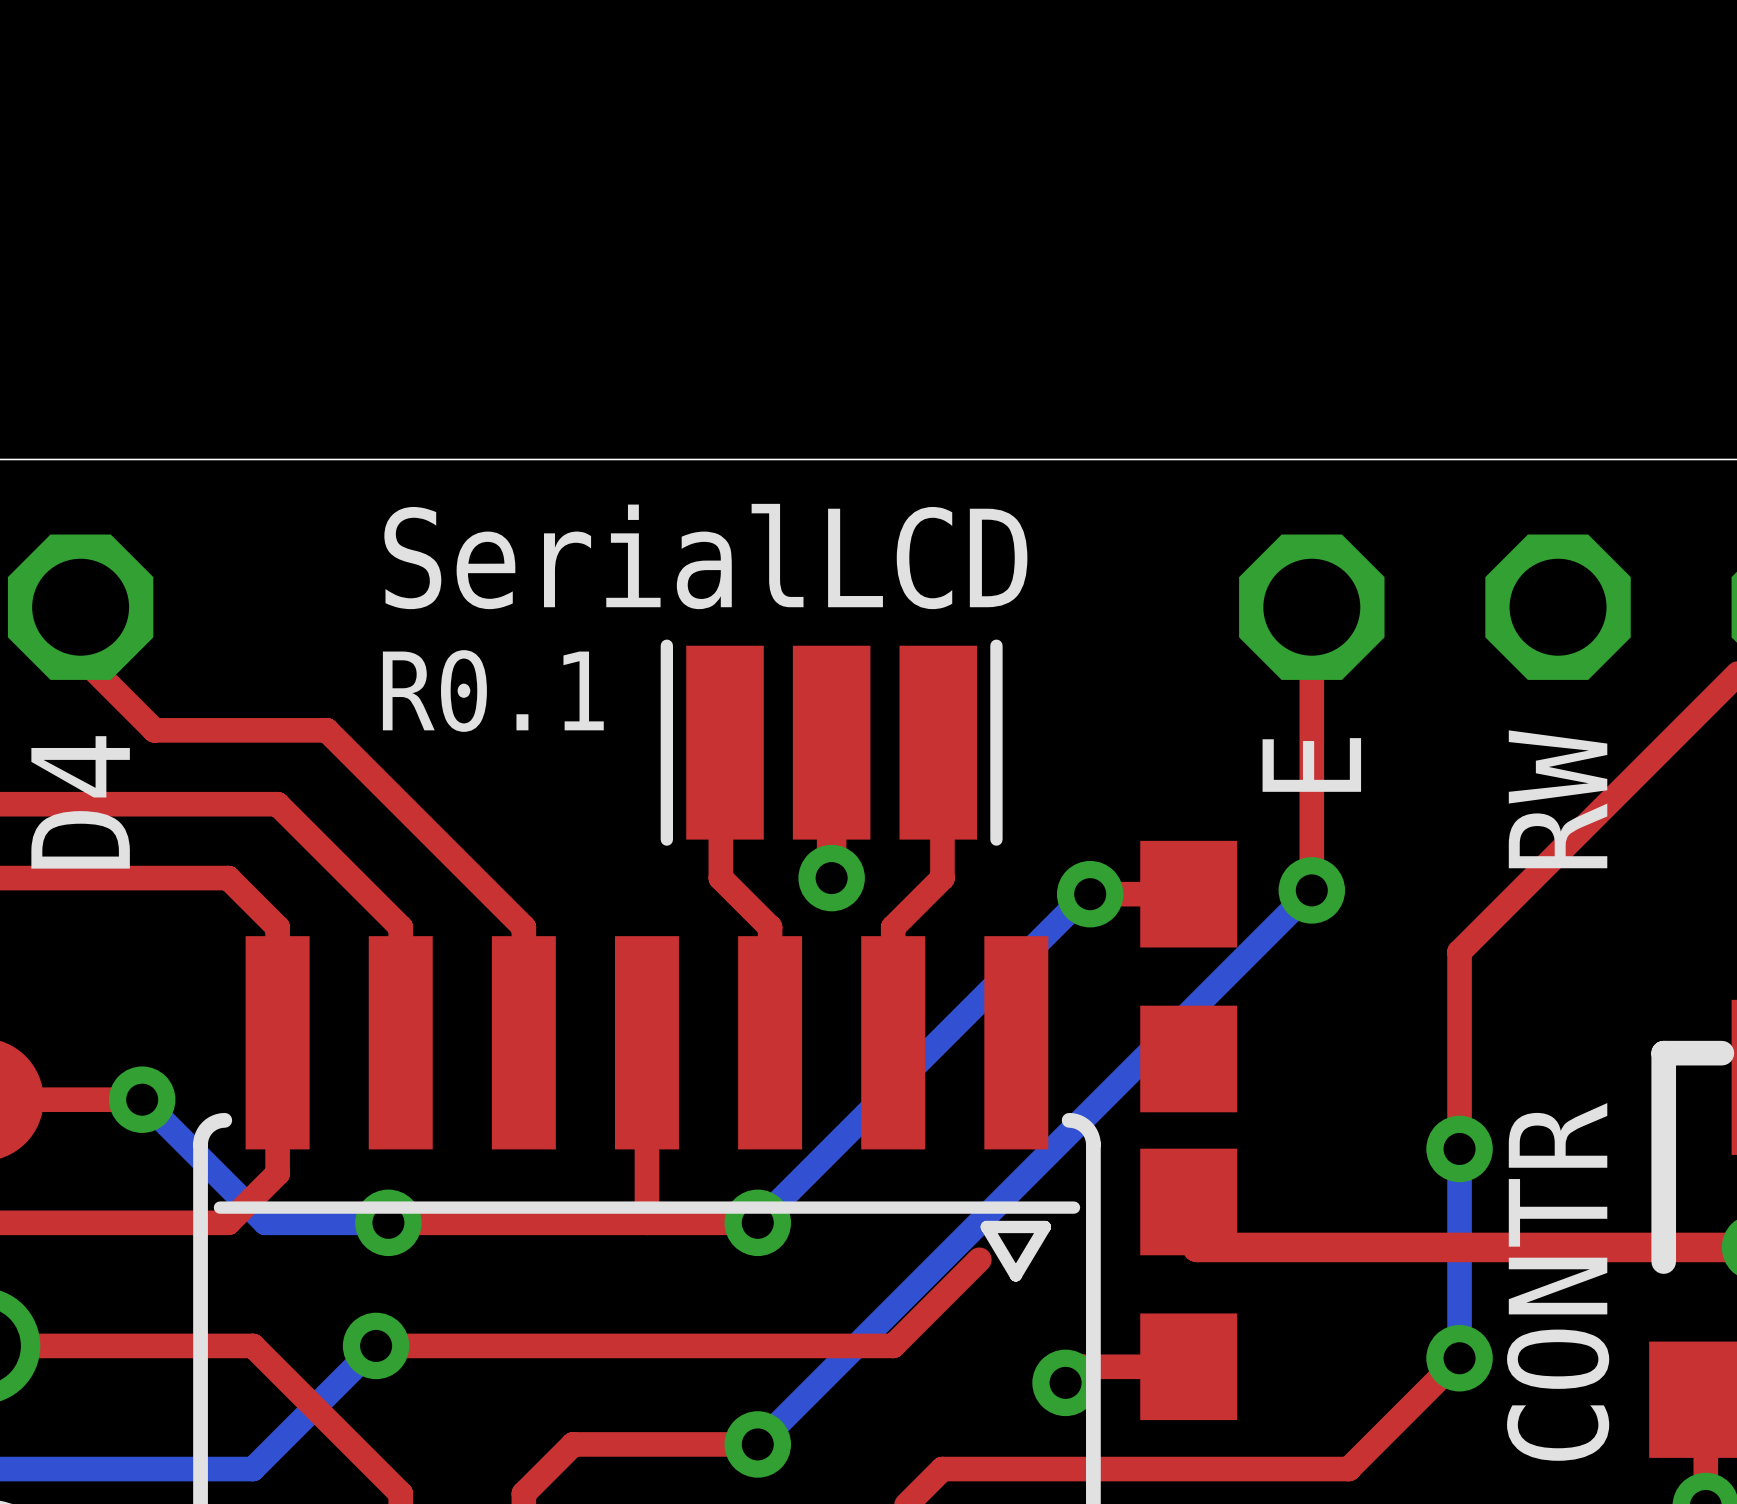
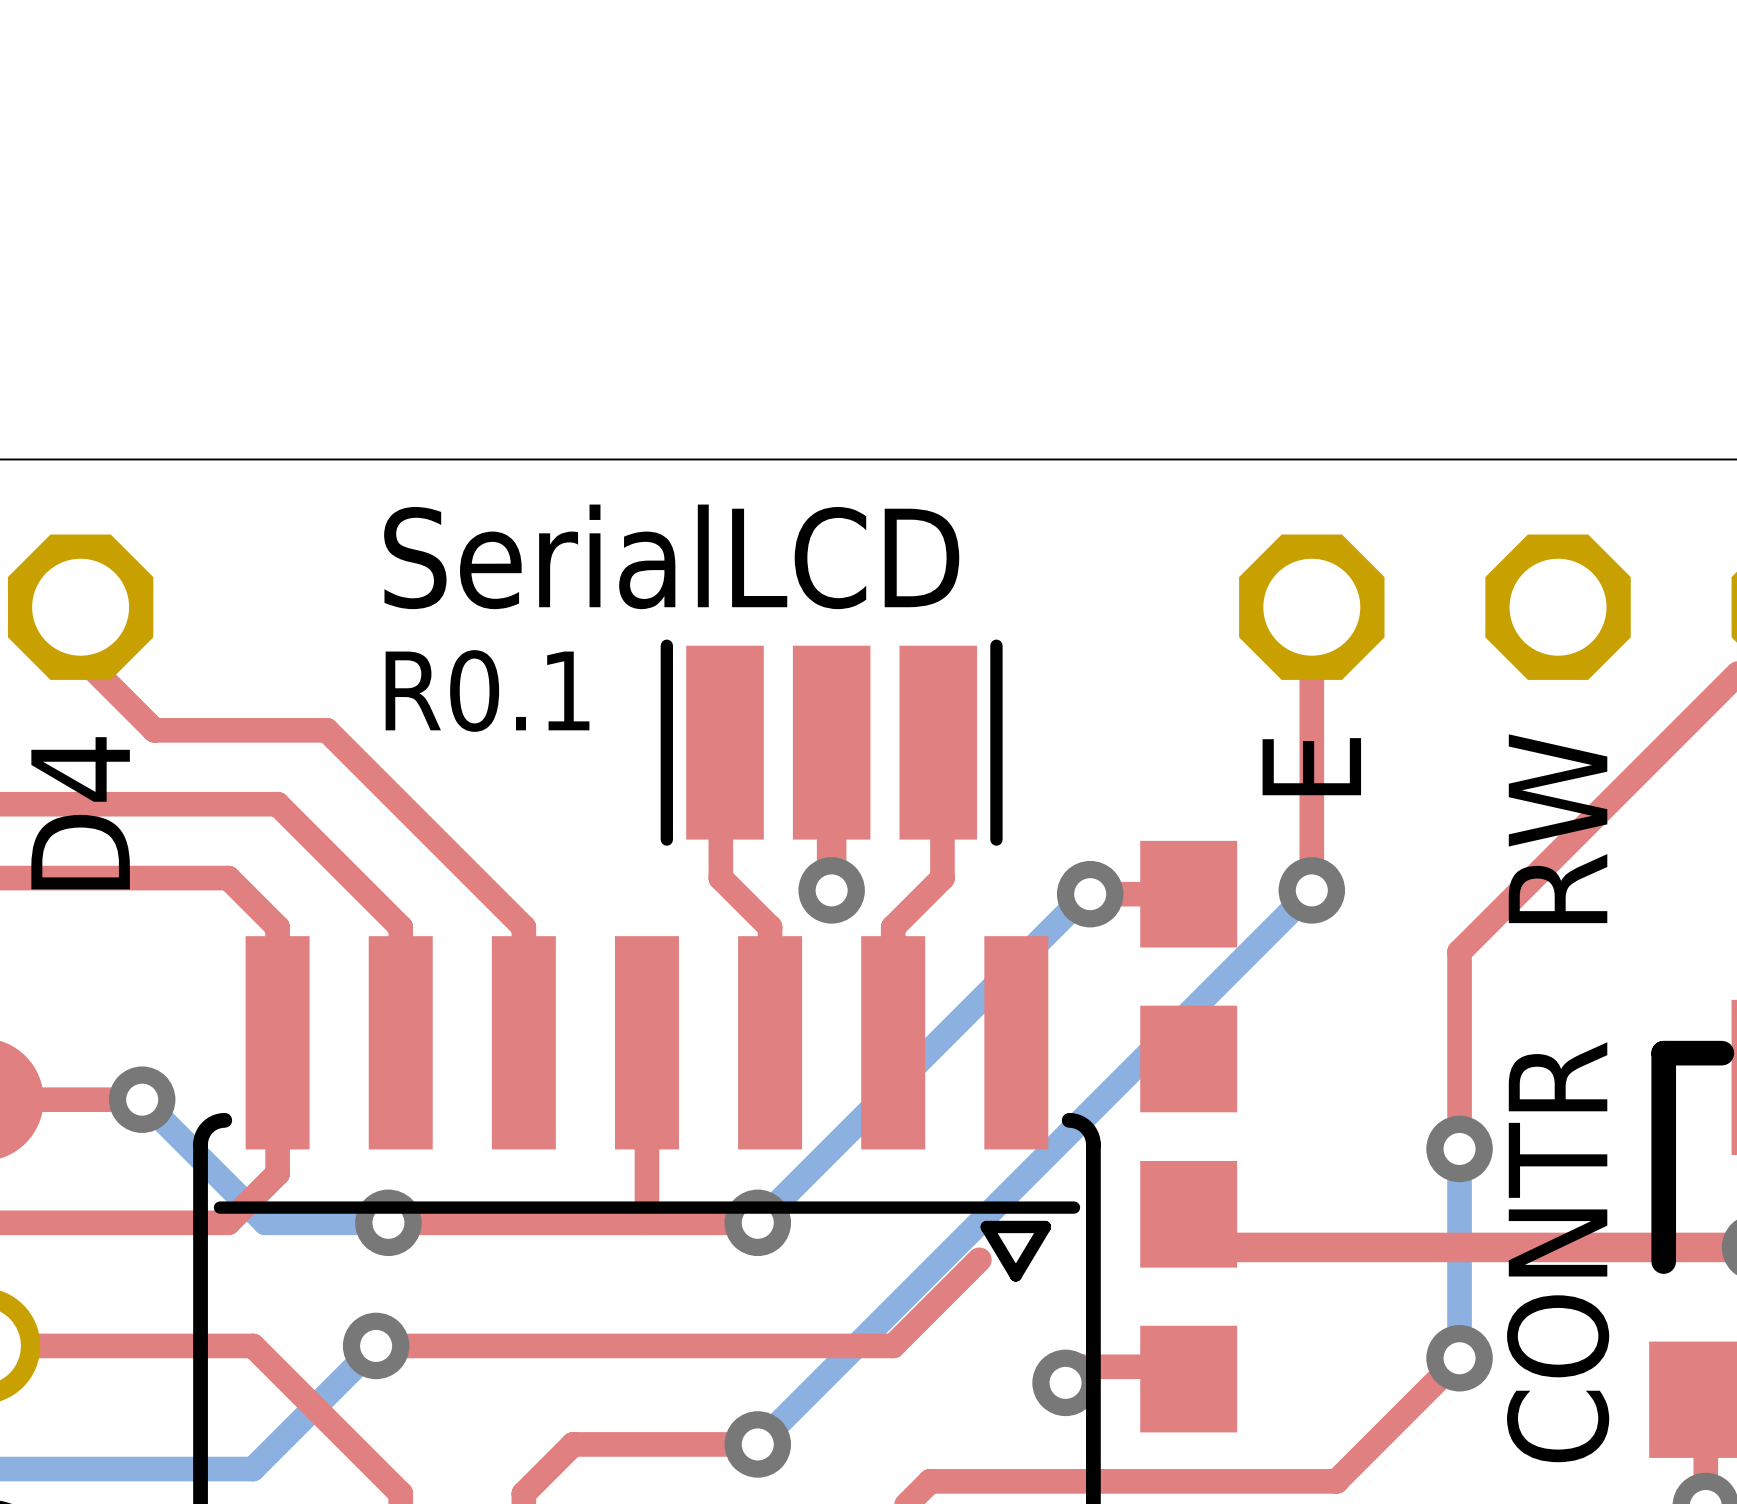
via position: (831, 878) -> (831, 890)
part position: (1188, 1284) -> (1188, 1296)
top track: (1348, 1469) (942, 1469) (930, 1481) -> (1348, 1469) (1336, 1481) (930, 1481)

